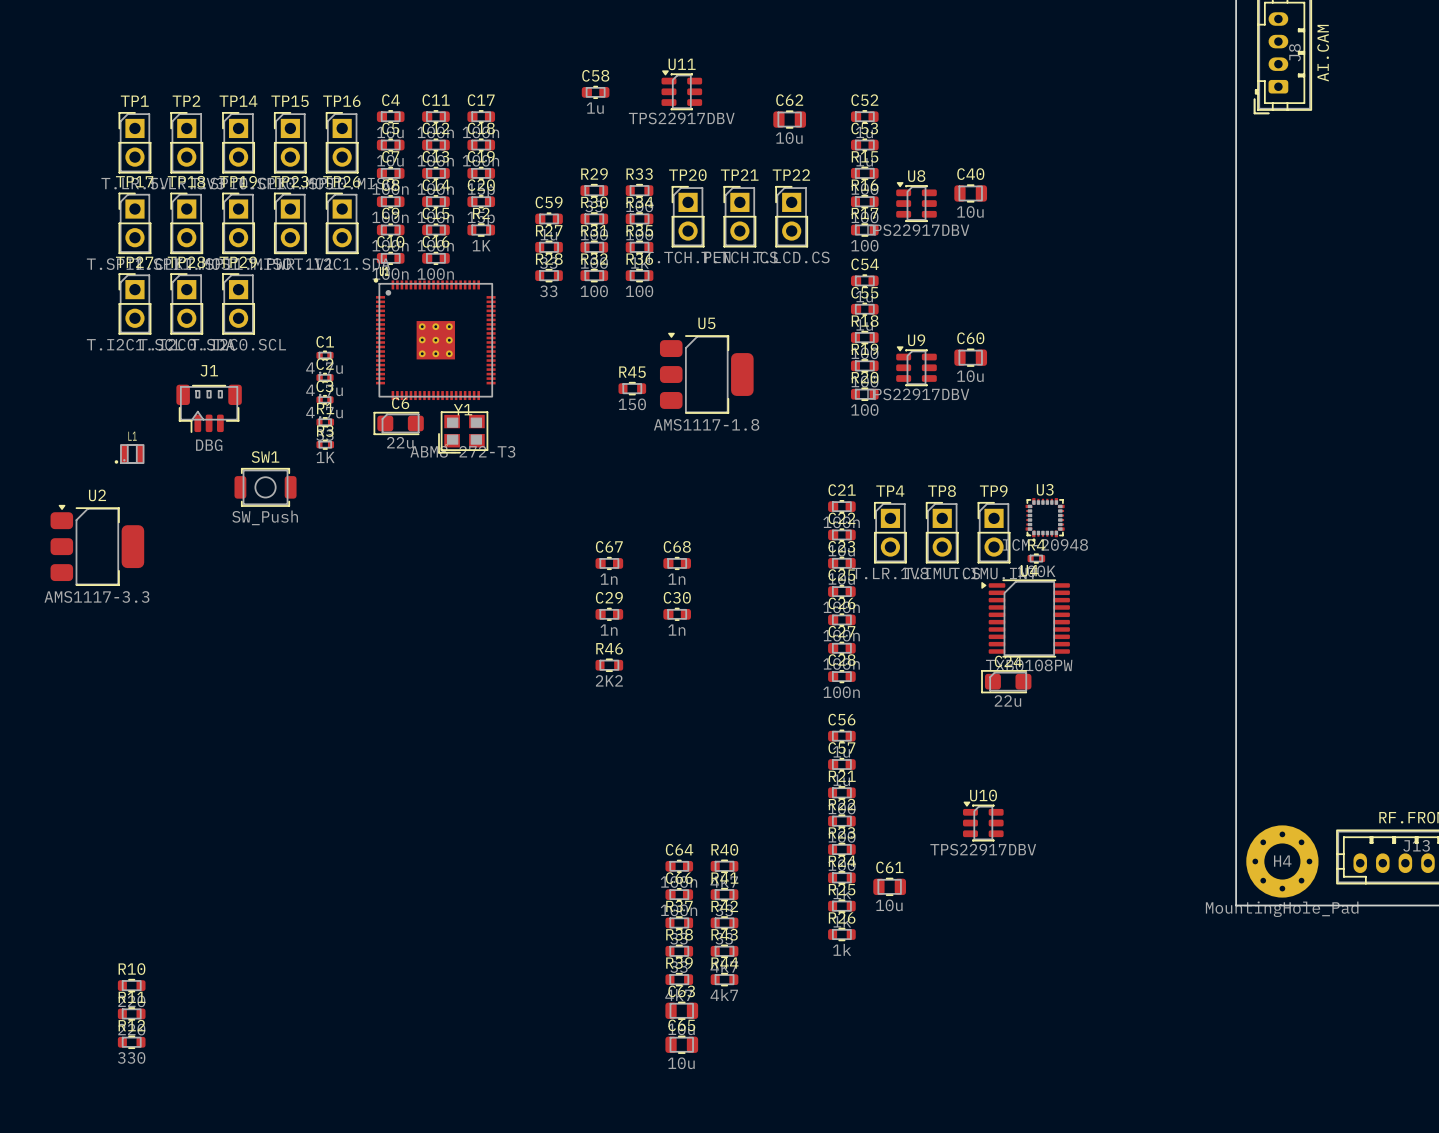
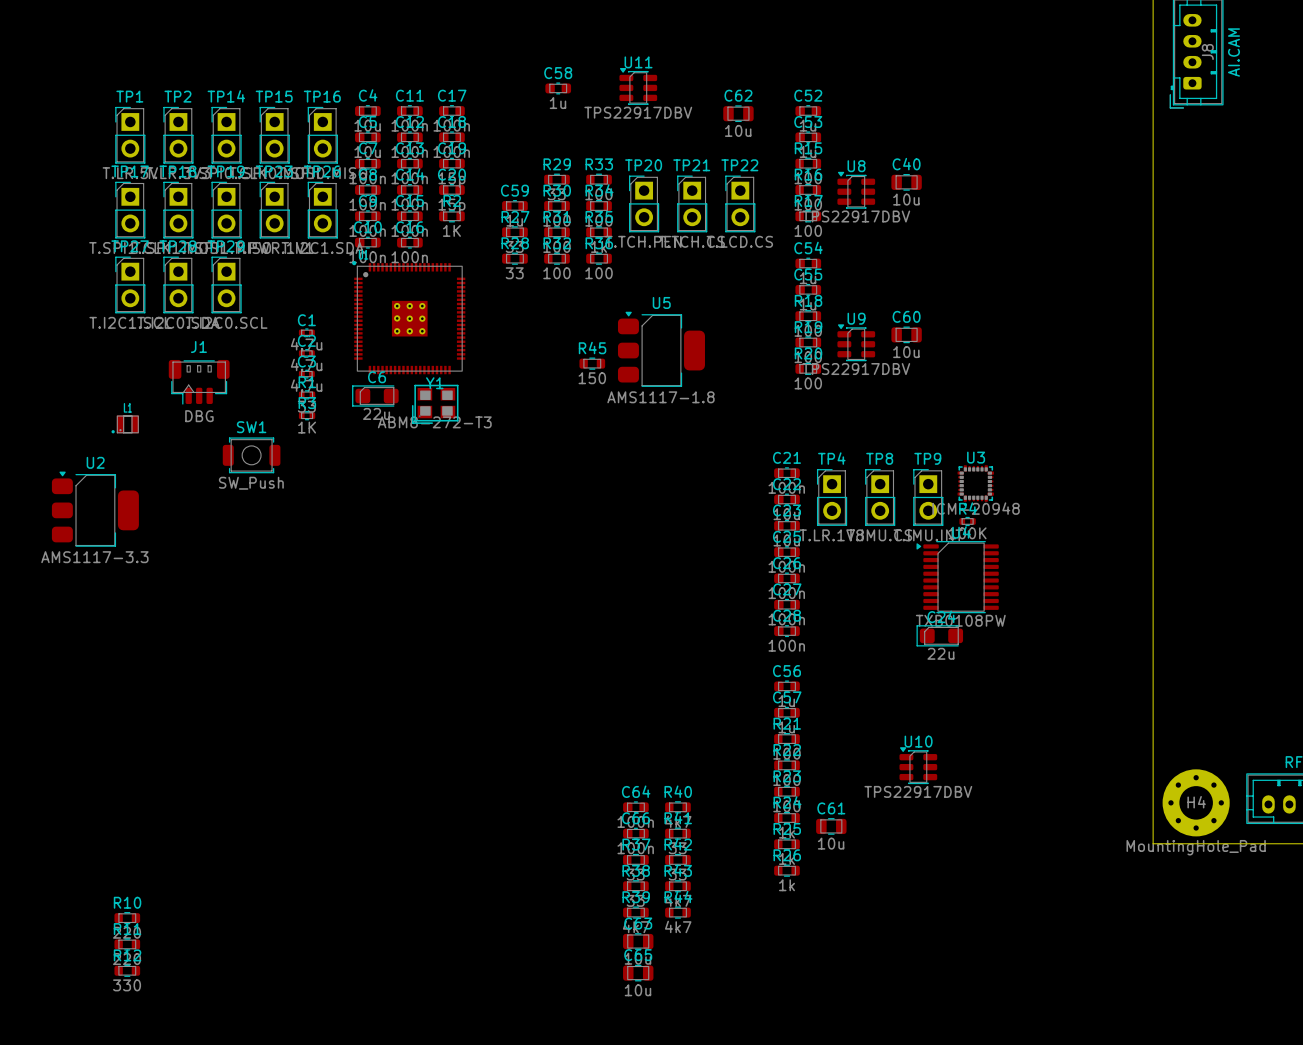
C67: 1n (609, 563) -> none
C68: 1n (677, 563) -> none
C29: 1n (609, 614) -> none
C30: 1n (677, 614) -> none
R46: 2K2 (609, 665) -> none

